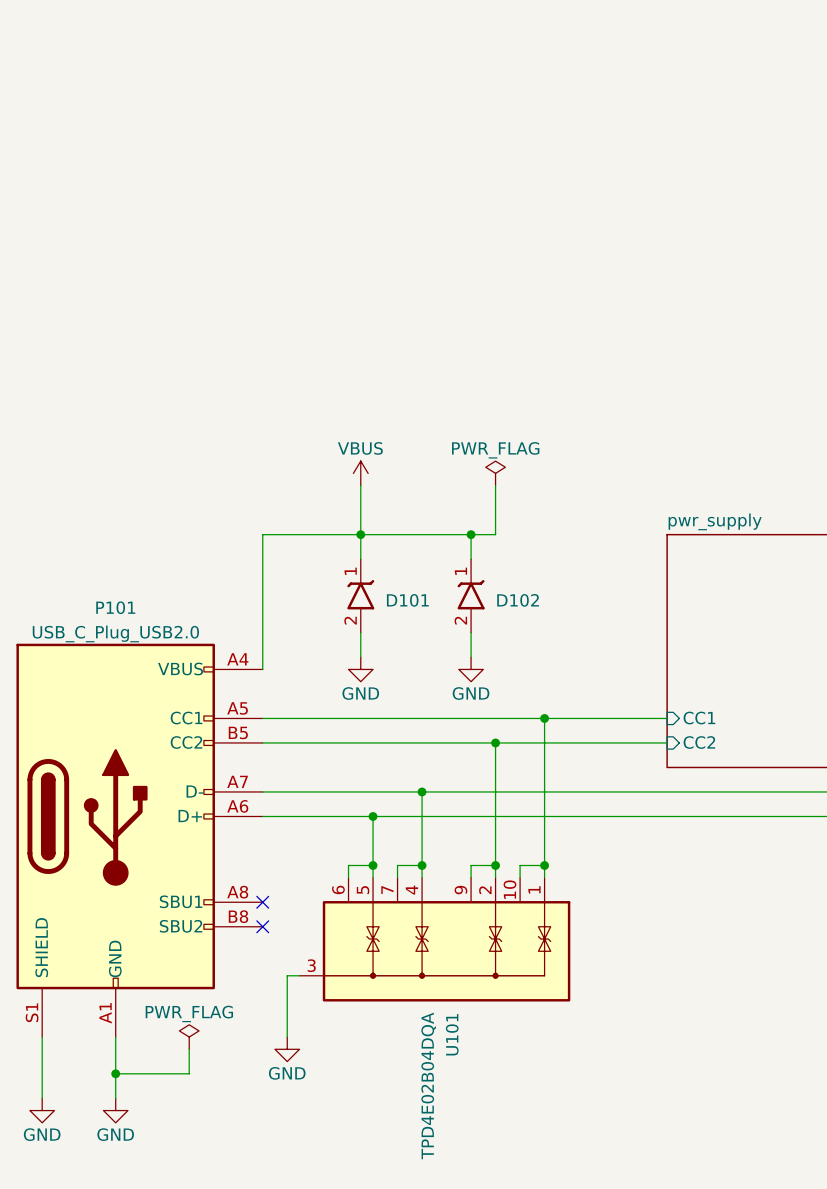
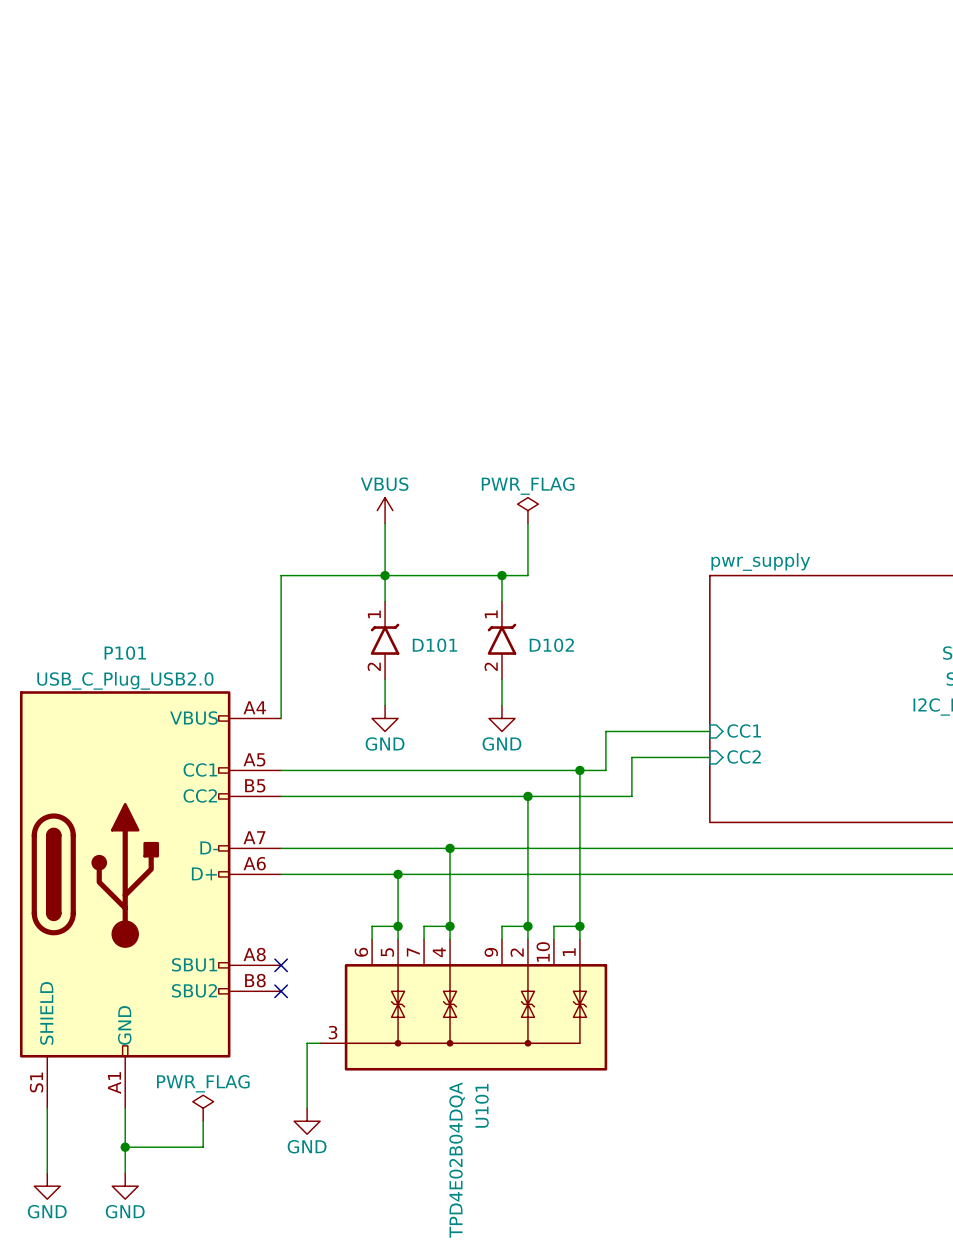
wire: (569, 718) (667, 718) -> (605, 770) (605, 731) (709, 731)
sheet pin position: CC1 (699, 718) -> CC1 (744, 731)
wire: (593, 742) (667, 742) -> (631, 796) (631, 757) (709, 757)
sheet pin position: CC2 (699, 742) -> CC2 (744, 756)

